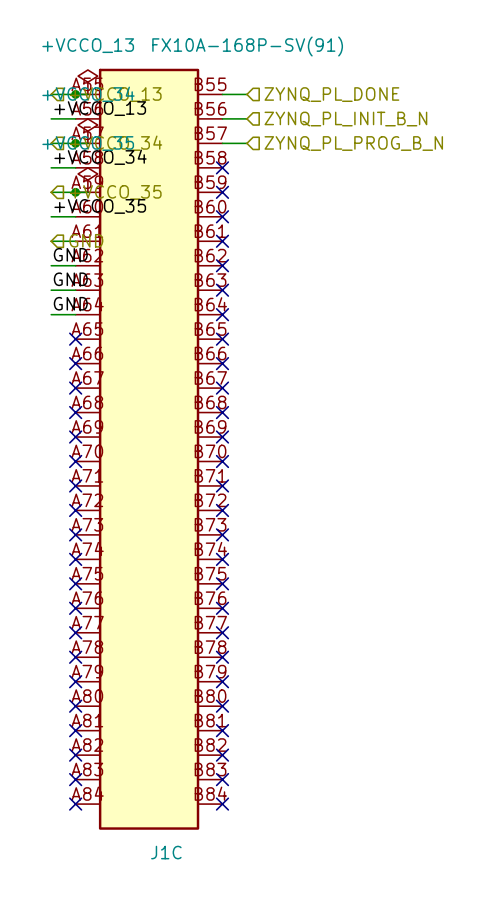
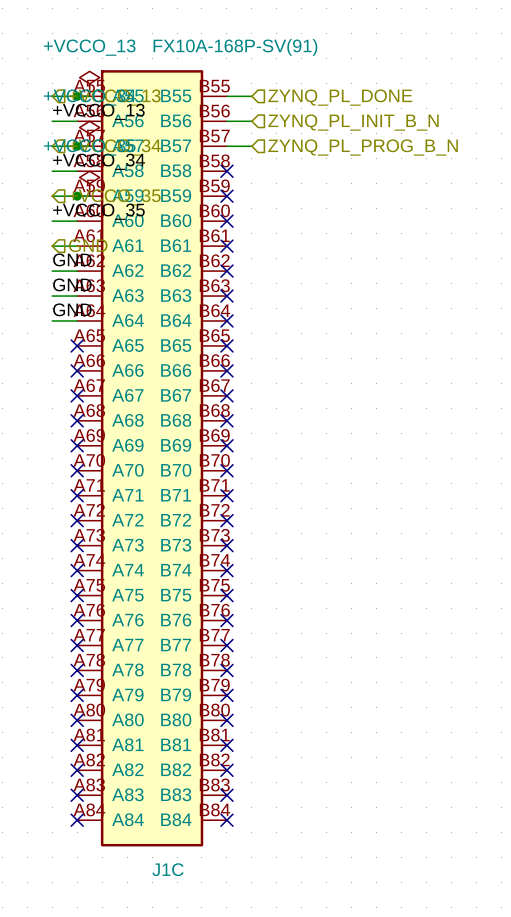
J1C symbol: [75, 68, 223, 830] -> [77, 70, 227, 847]

